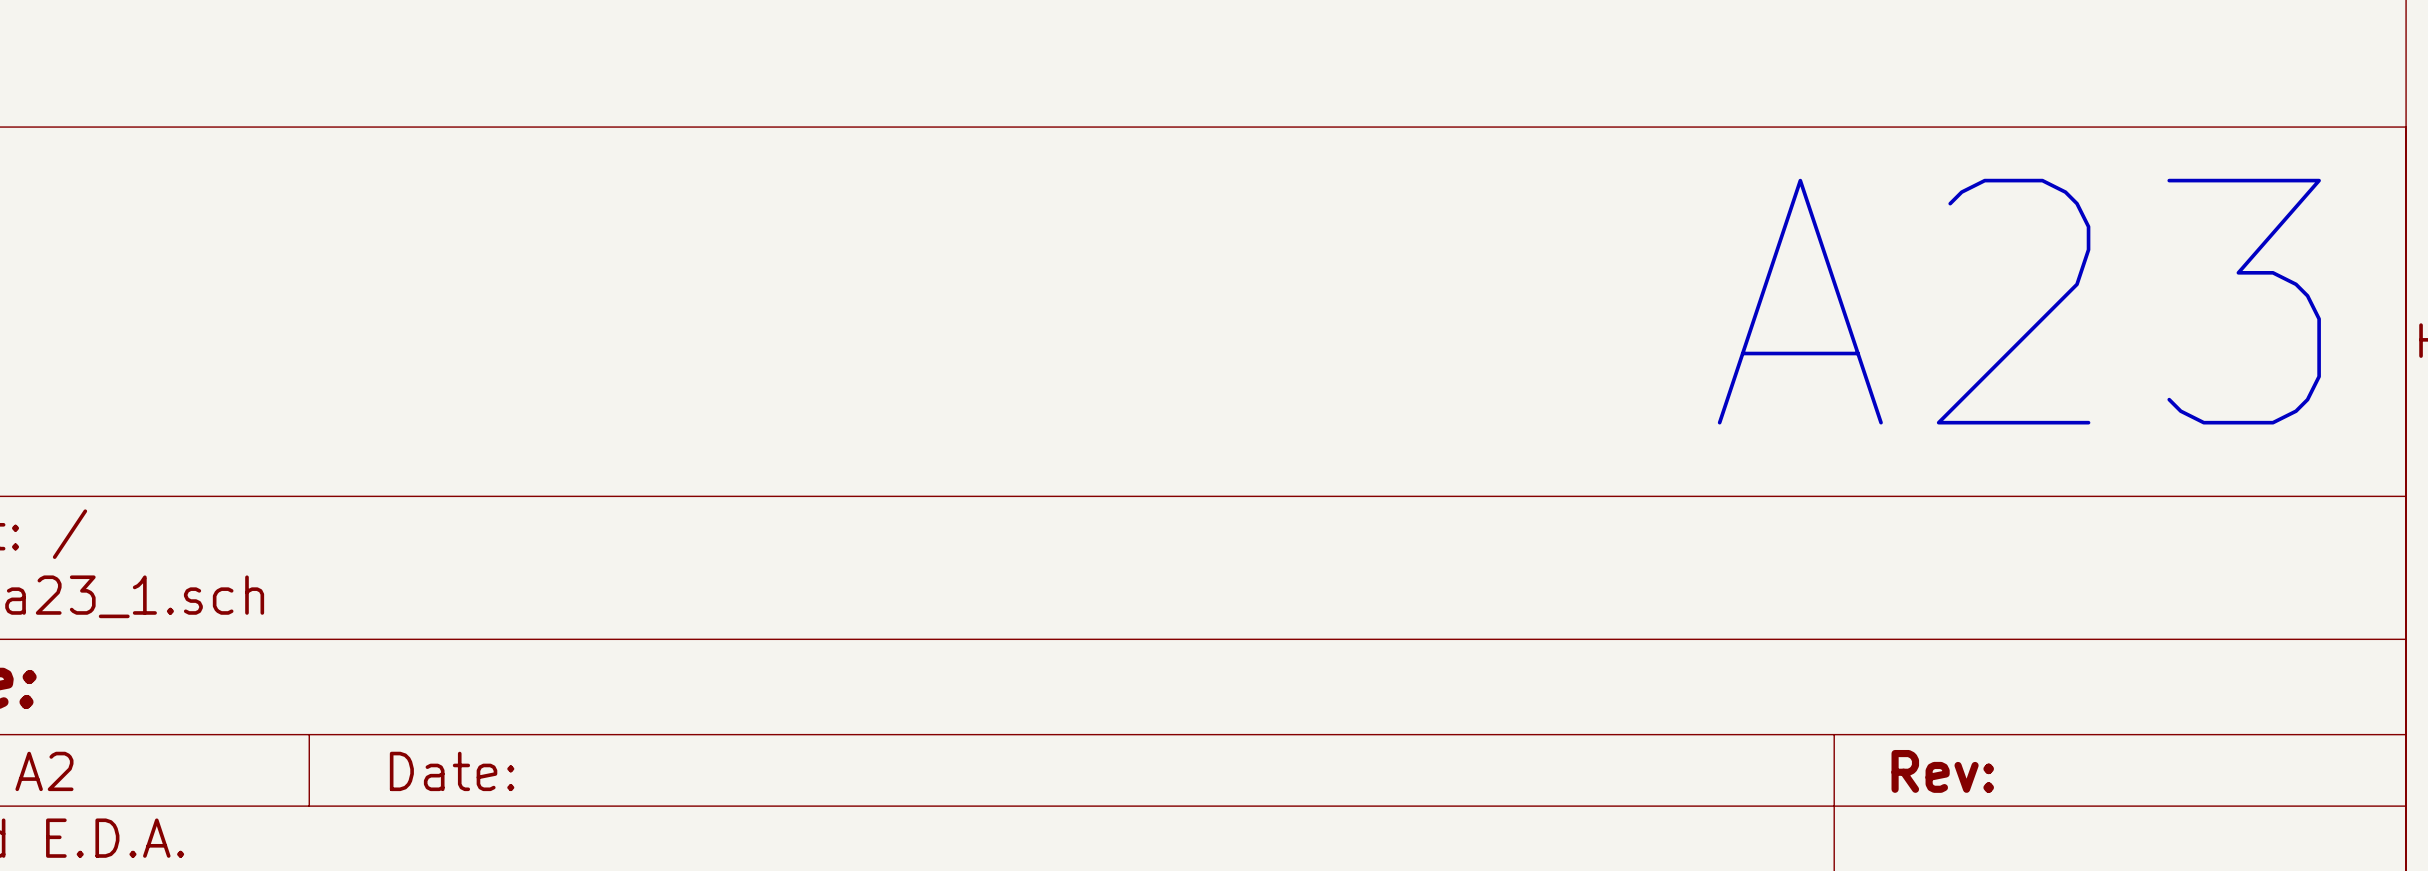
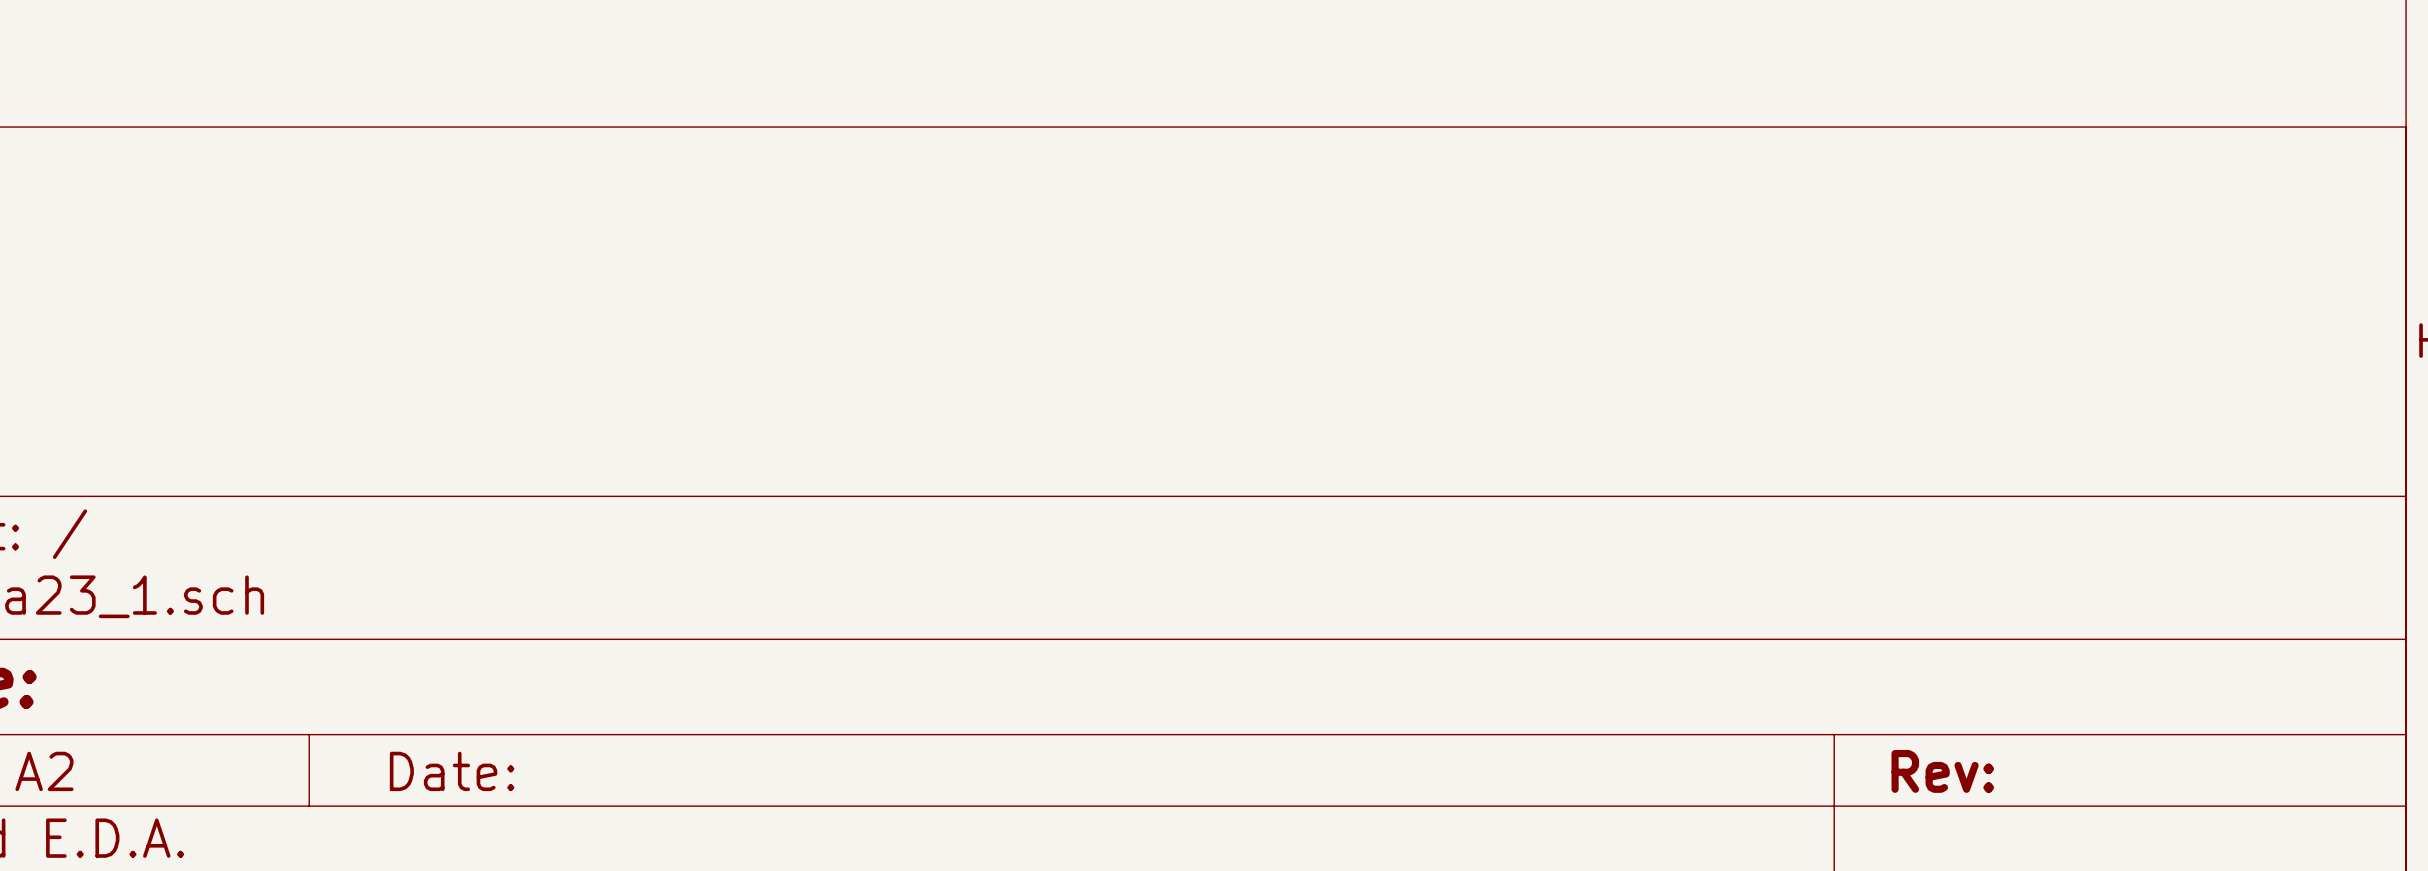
text: A23 (2019, 301) -> none

